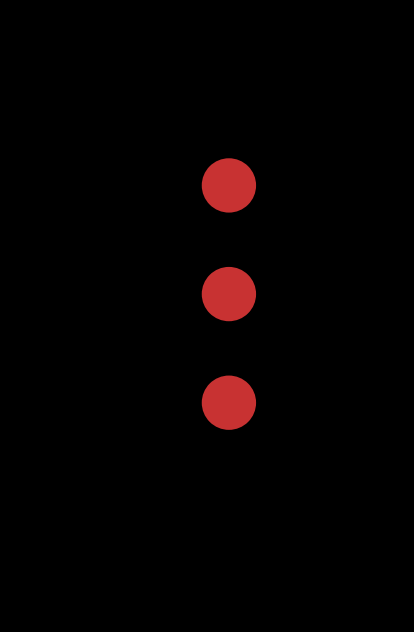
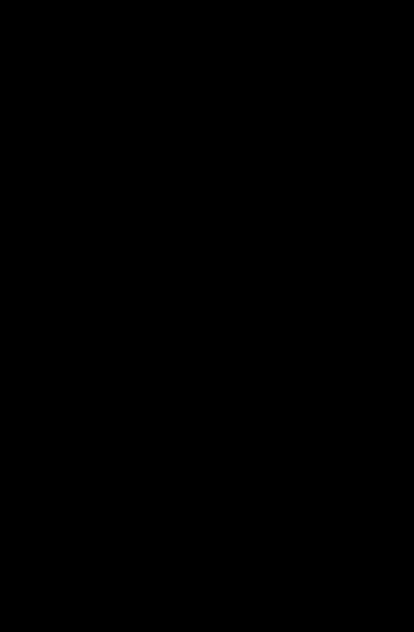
part: (228, 185) -> none
part: (228, 294) -> none
part: (228, 402) -> none

